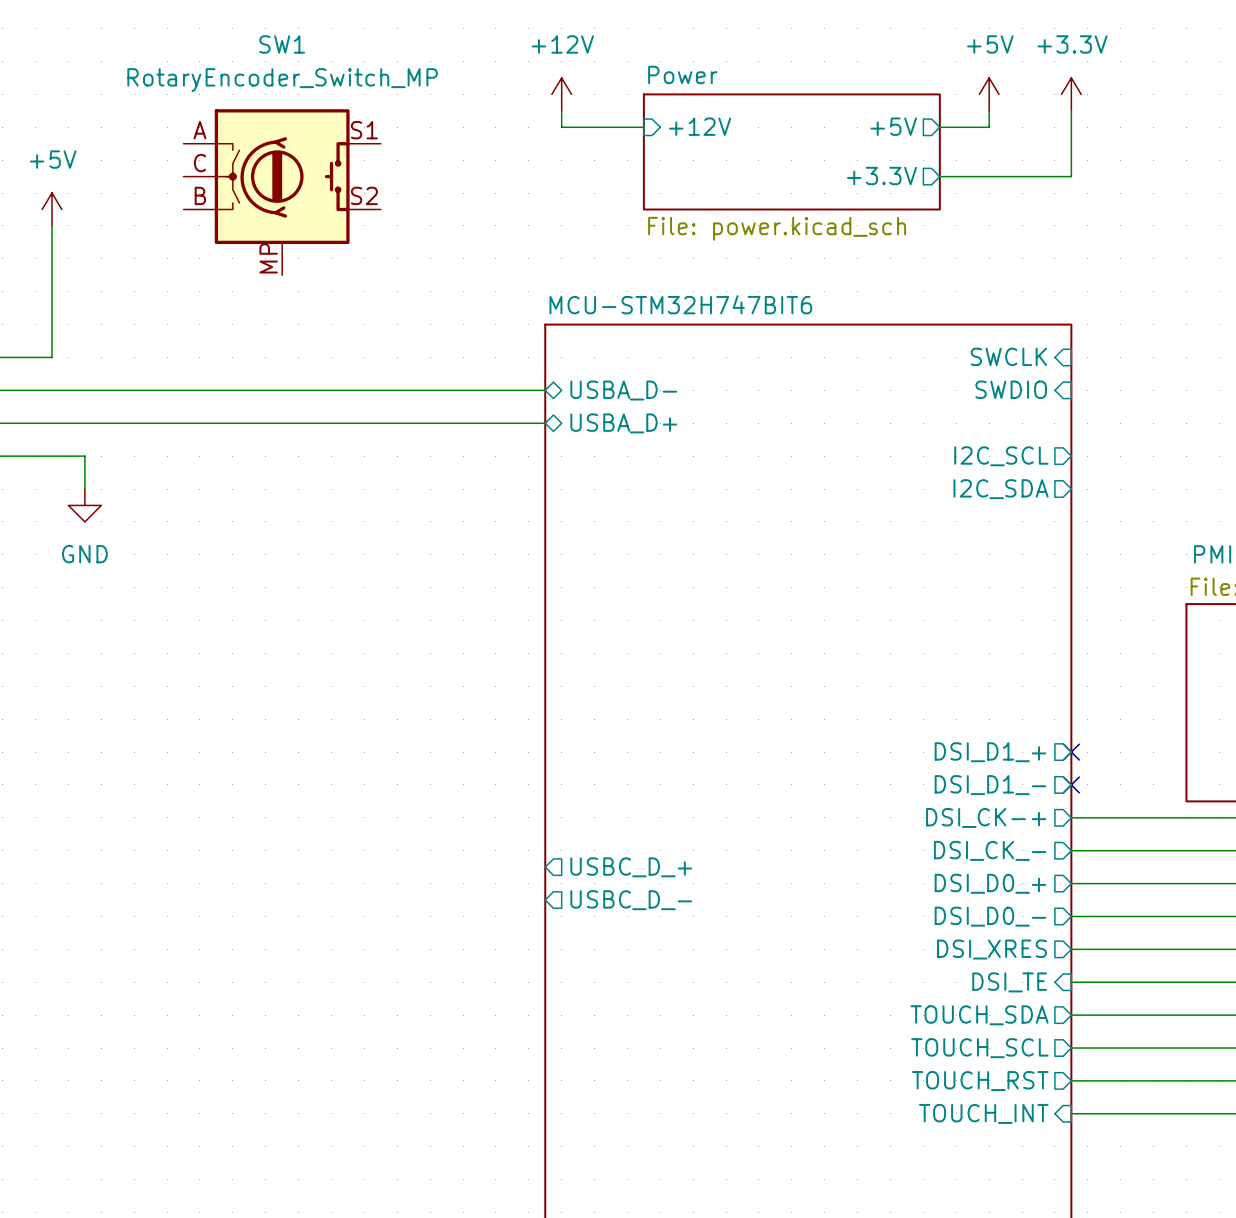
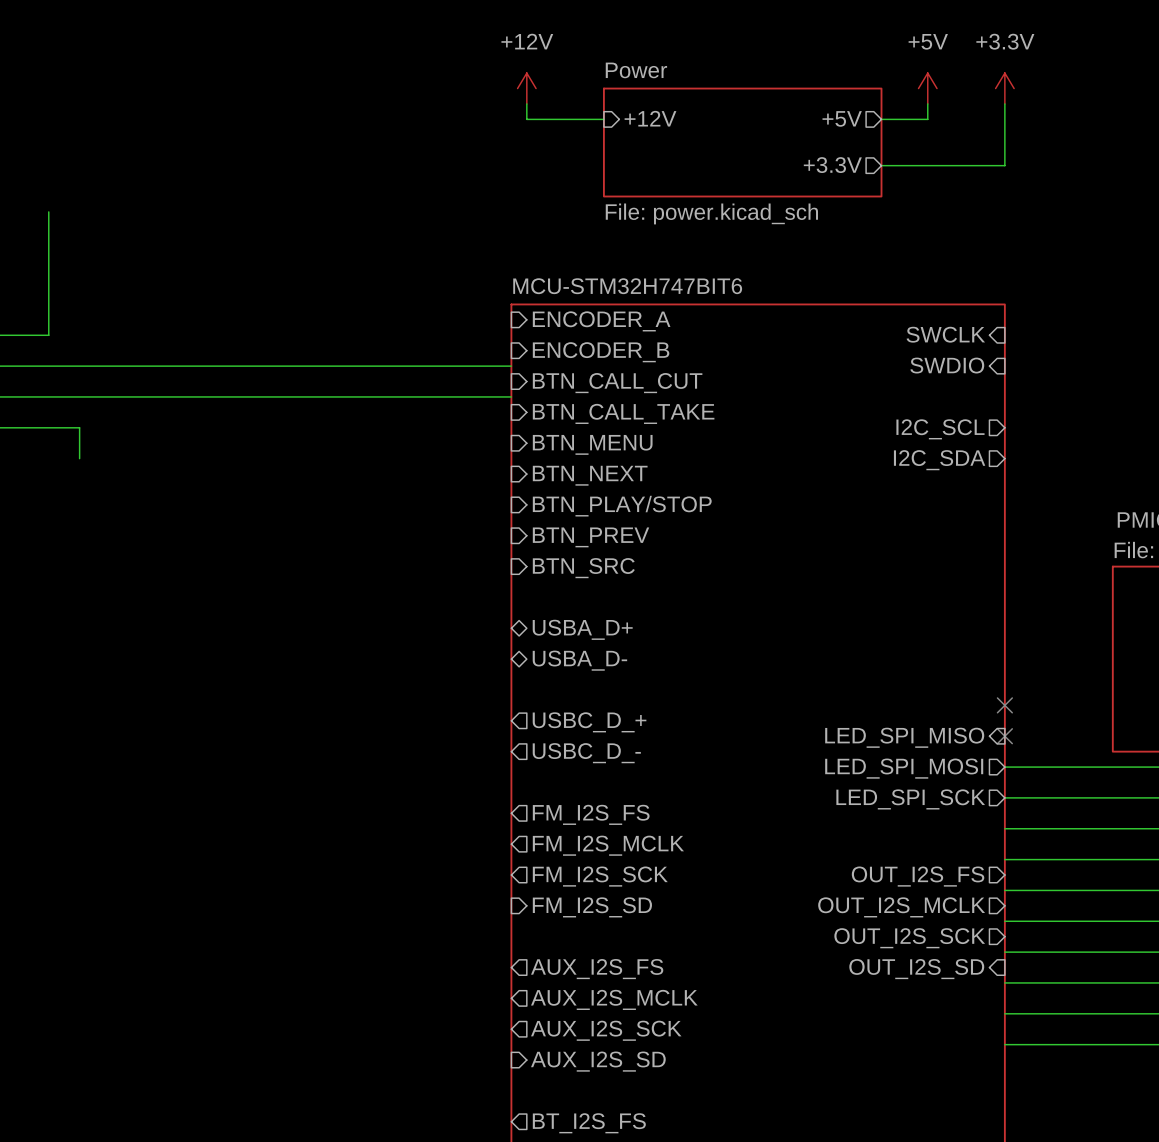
SW1: RotaryEncoder_Switch_MP (282, 192) -> none
power symbol: +5V (52, 209) -> none
sheet pin: none -> ENCODER_A (601, 321)
sheet pin: none -> ENCODER_B (601, 352)
sheet pin position: USBA_D- (623, 390) -> USBA_D- (579, 660)
sheet pin: none -> BTN_CALL_CUT (617, 383)
sheet pin position: USBA_D+ (623, 423) -> USBA_D+ (582, 629)
sheet pin: none -> BTN_CALL_TAKE (623, 413)
sheet pin: none -> BTN_MENU (592, 444)
power symbol: GND (84, 505) -> none
sheet pin: none -> BTN_NEXT (590, 475)
sheet pin: none -> BTN_PLAY/STOP (622, 506)
sheet pin: none -> BTN_PREV (591, 537)
sheet pin: none -> BTN_SRC (583, 568)
sheet pin: DSI_D1_+ (990, 752) -> none
sheet pin: none -> USBC_D_+ (589, 722)
sheet pin shape: output (990, 785) -> input (904, 737)
sheet pin: DSI_D1_- (990, 785) -> LED_SPI_MISO (904, 737)
sheet pin: none -> USBC_D_- (586, 753)
sheet pin: DSI_CK-+ (986, 817) -> LED_SPI_MOSI (904, 768)
sheet pin: DSI_CK_- (990, 850) -> LED_SPI_SCK (910, 799)
sheet pin: USBC_D_+ (631, 867) -> FM_I2S_FS (591, 814)
sheet pin: DSI_D0_+ (990, 883) -> none
sheet pin: USBC_D_- (631, 900) -> FM_I2S_MCLK (608, 845)
sheet pin: DSI_D0_- (990, 916) -> none
sheet pin: none -> FM_I2S_SCK (600, 876)
sheet pin: none -> OUT_I2S_FS (918, 876)
sheet pin: DSI_XRES (992, 949) -> none
sheet pin: none -> FM_I2S_SD (592, 907)
sheet pin: none -> OUT_I2S_MCLK (901, 907)
sheet pin: DSI_TE (1009, 982) -> none
sheet pin: none -> OUT_I2S_SCK (909, 938)
sheet pin: TOUCH_SDA (979, 1015) -> none
sheet pin: none -> AUX_I2S_FS (597, 969)
sheet pin: none -> OUT_I2S_SD (916, 969)
sheet pin: TOUCH_SCL (979, 1048) -> none
sheet pin: none -> AUX_I2S_MCLK (614, 999)
sheet pin: TOUCH_RST (980, 1081) -> none
sheet pin: none -> AUX_I2S_SCK (606, 1030)
sheet pin: TOUCH_INT (983, 1113) -> none
sheet pin: none -> AUX_I2S_SD (598, 1061)
sheet pin: none -> BT_I2S_FS (589, 1123)

